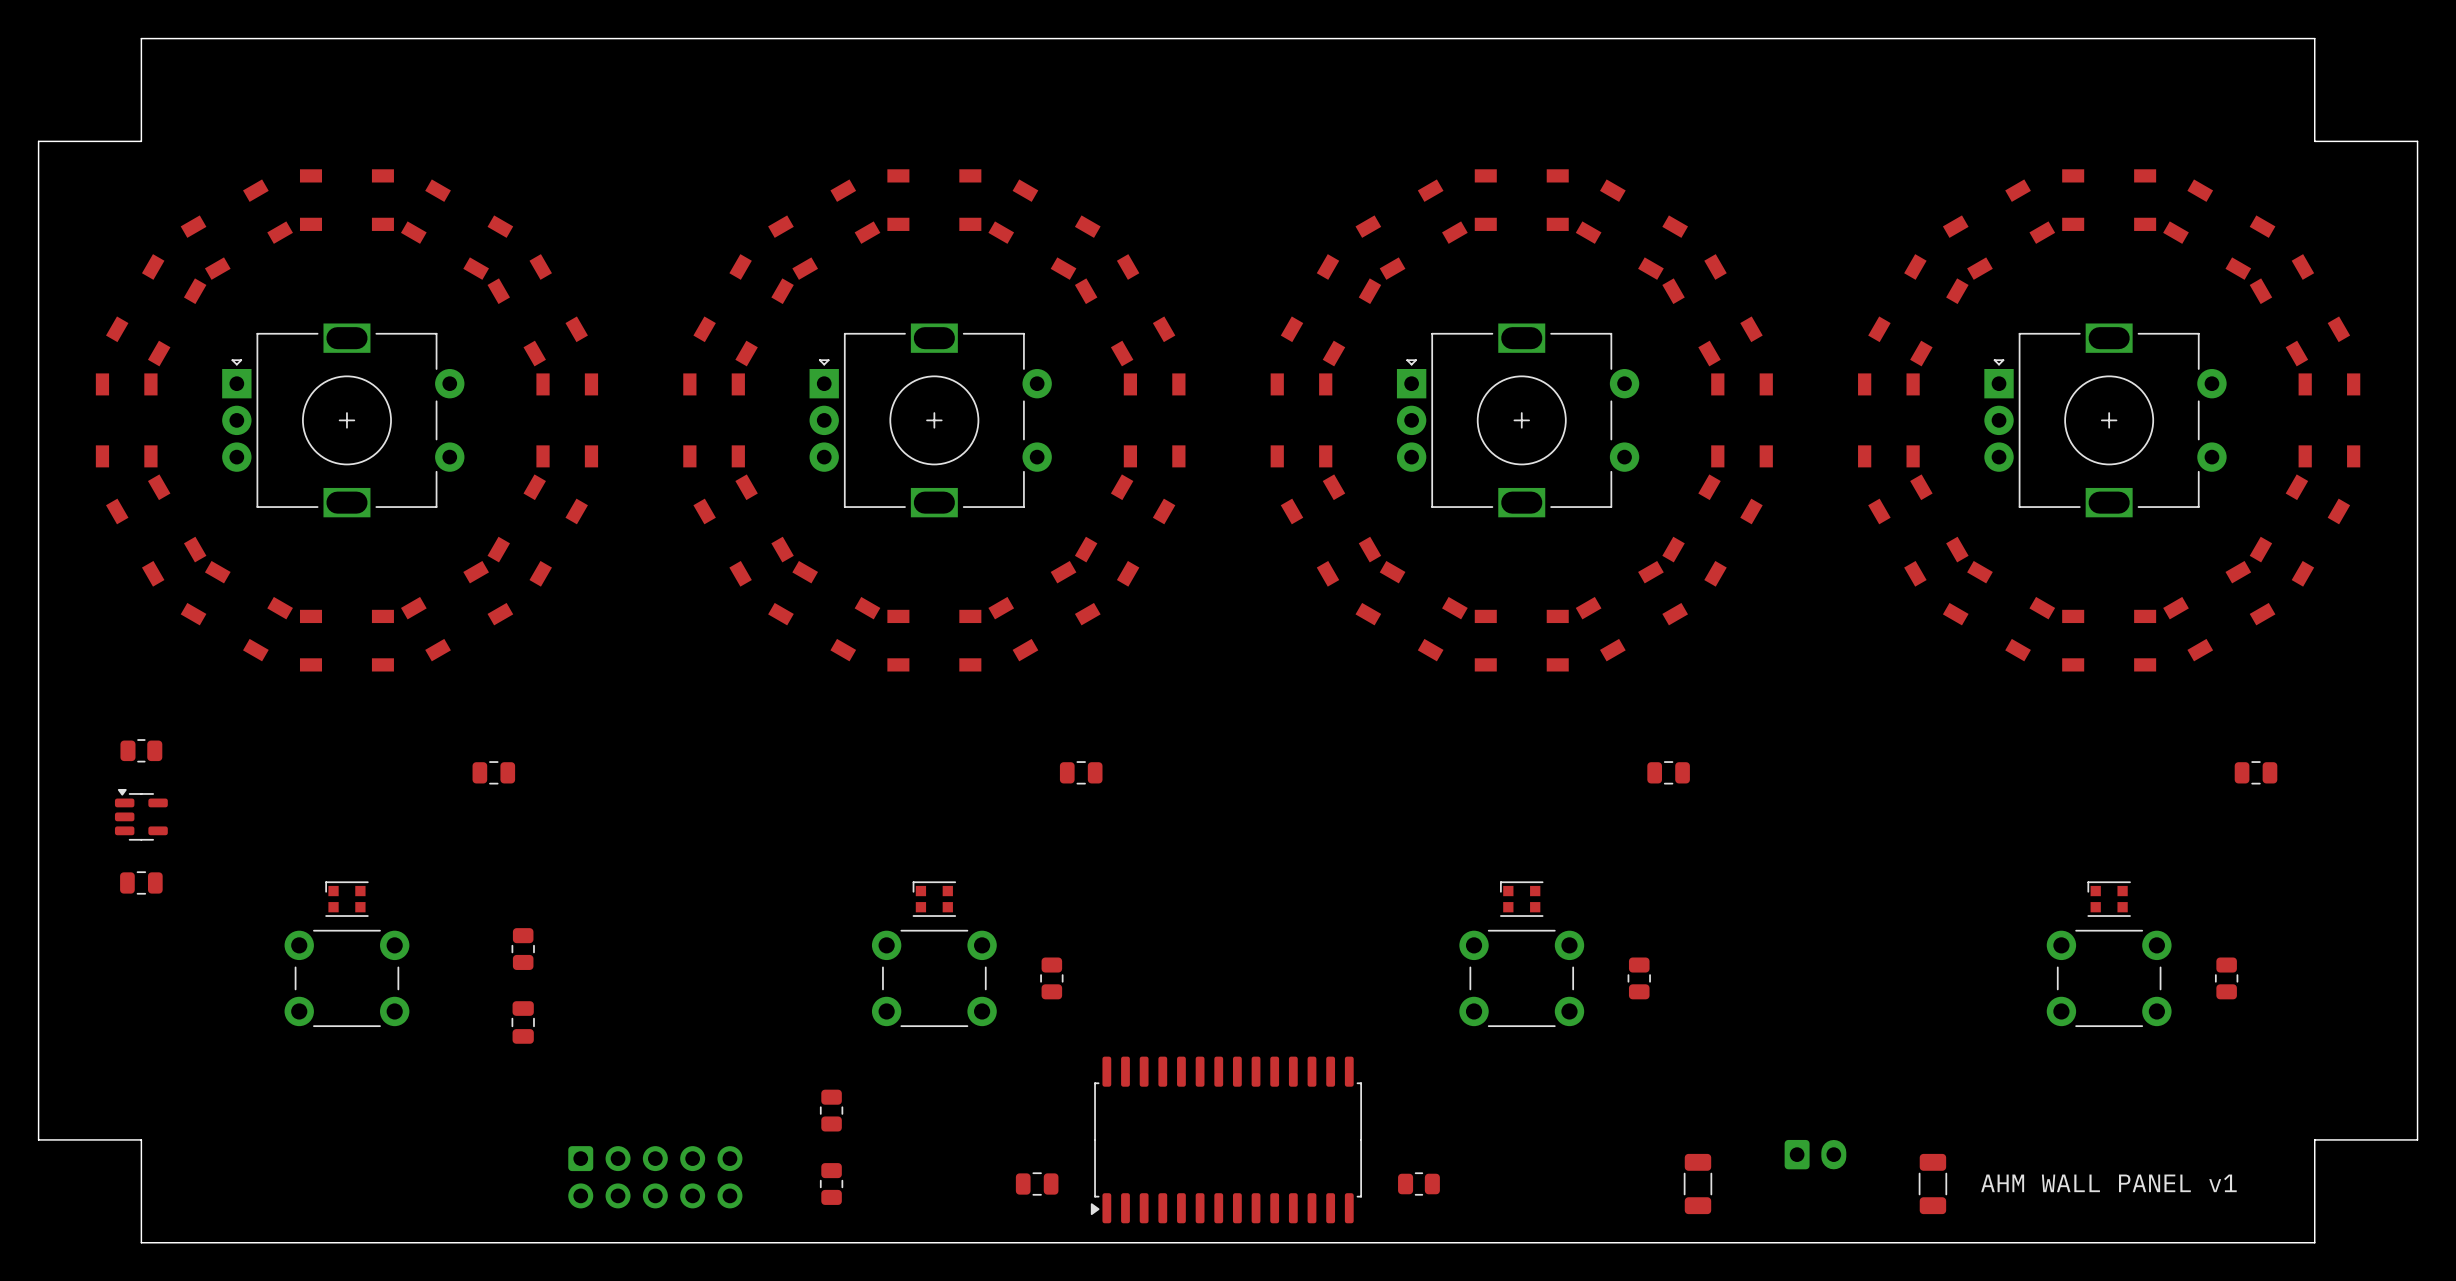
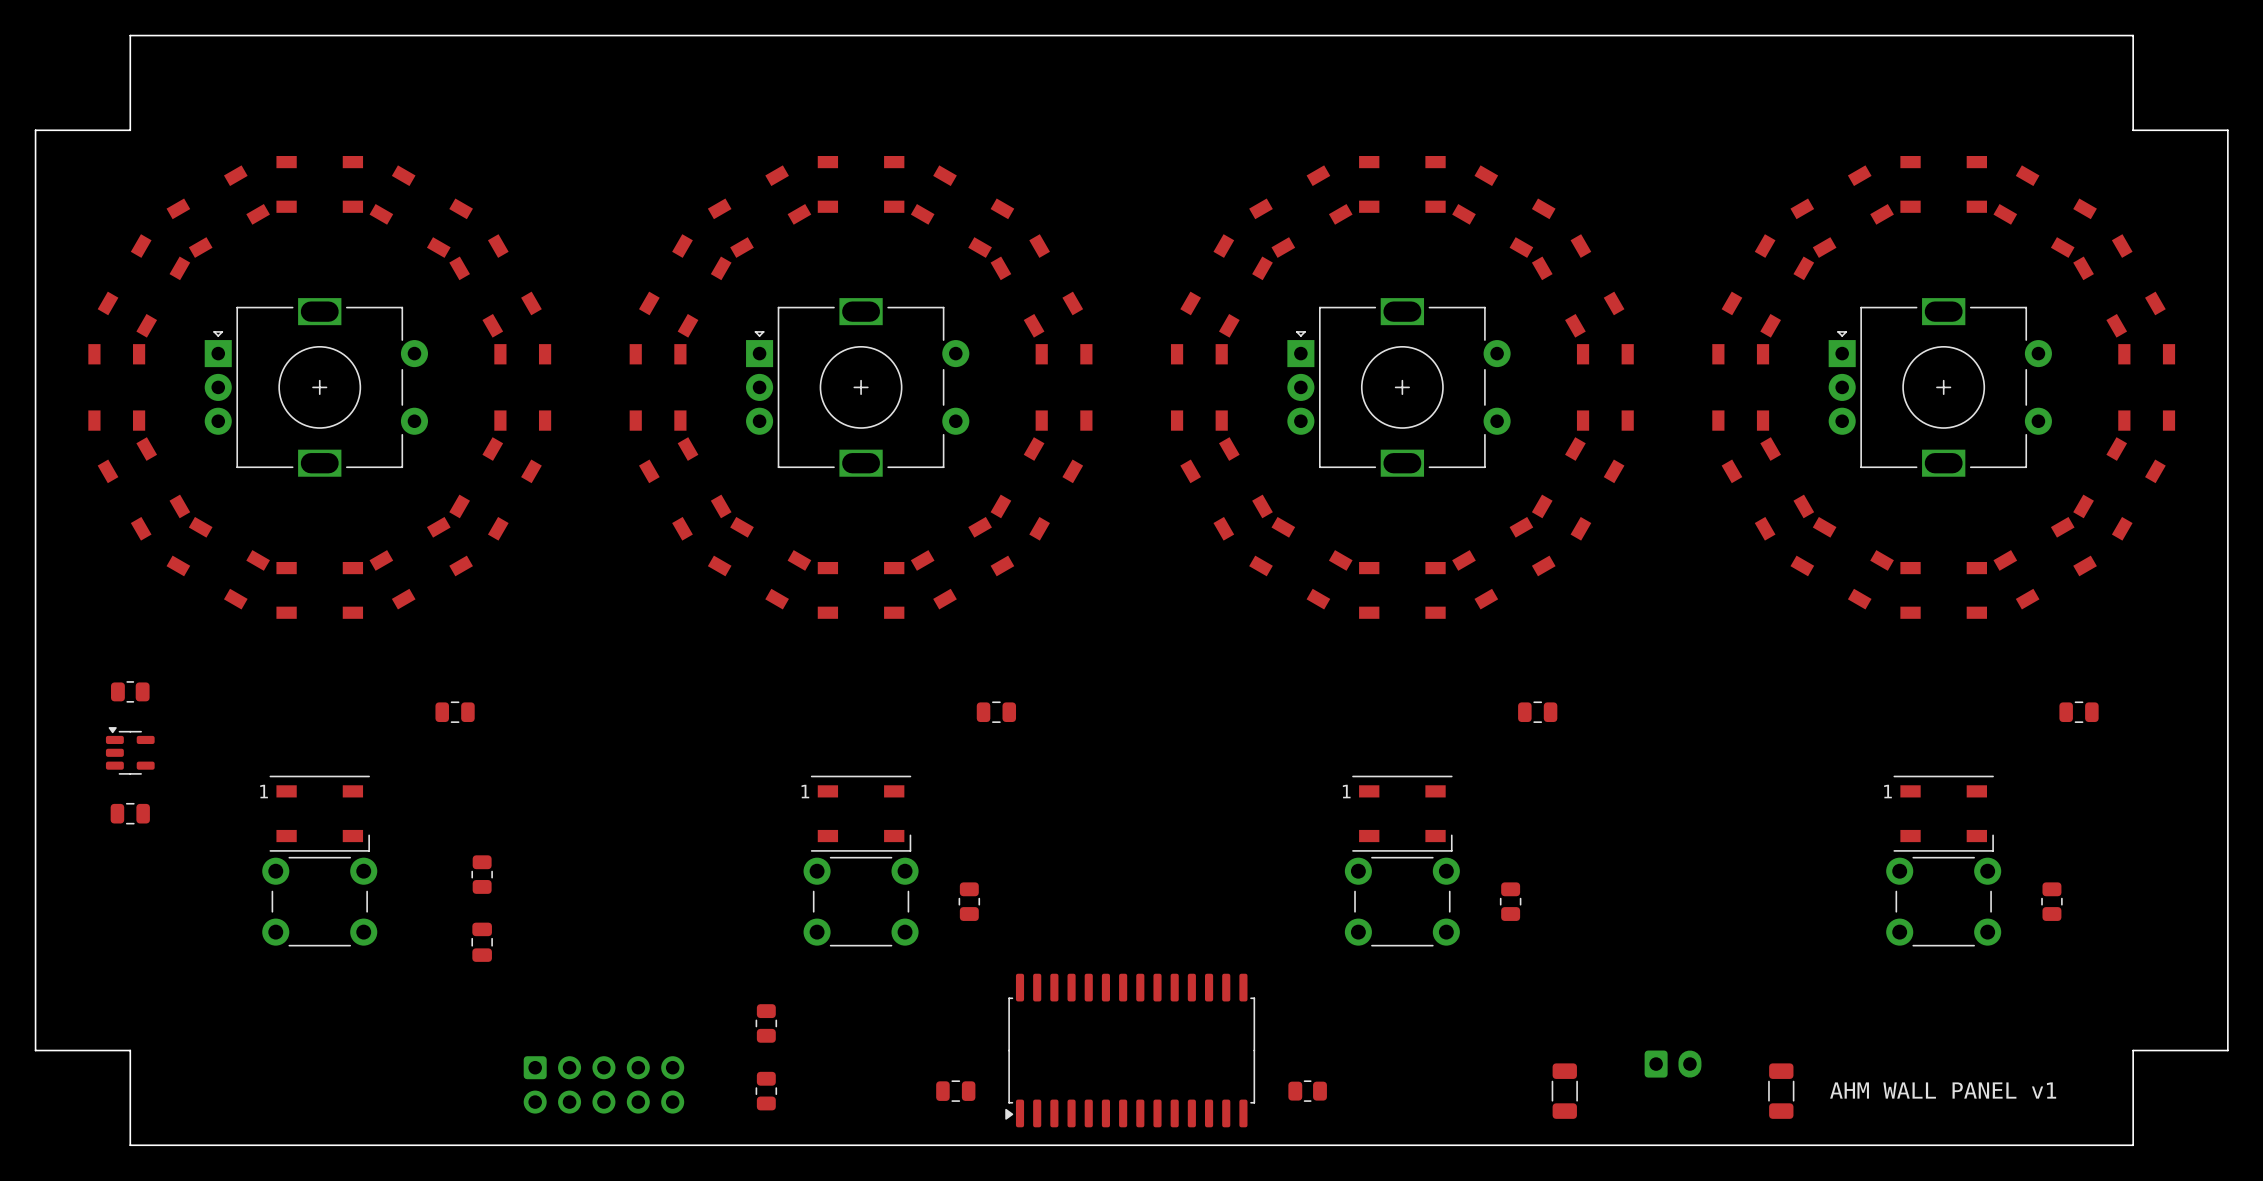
part: none -> (319, 813)
part: none -> (861, 813)
part: none -> (1402, 813)
part: none -> (1943, 813)
part: (346, 899) -> none
part: (934, 899) -> none
part: (1521, 899) -> none
part: (2109, 899) -> none

